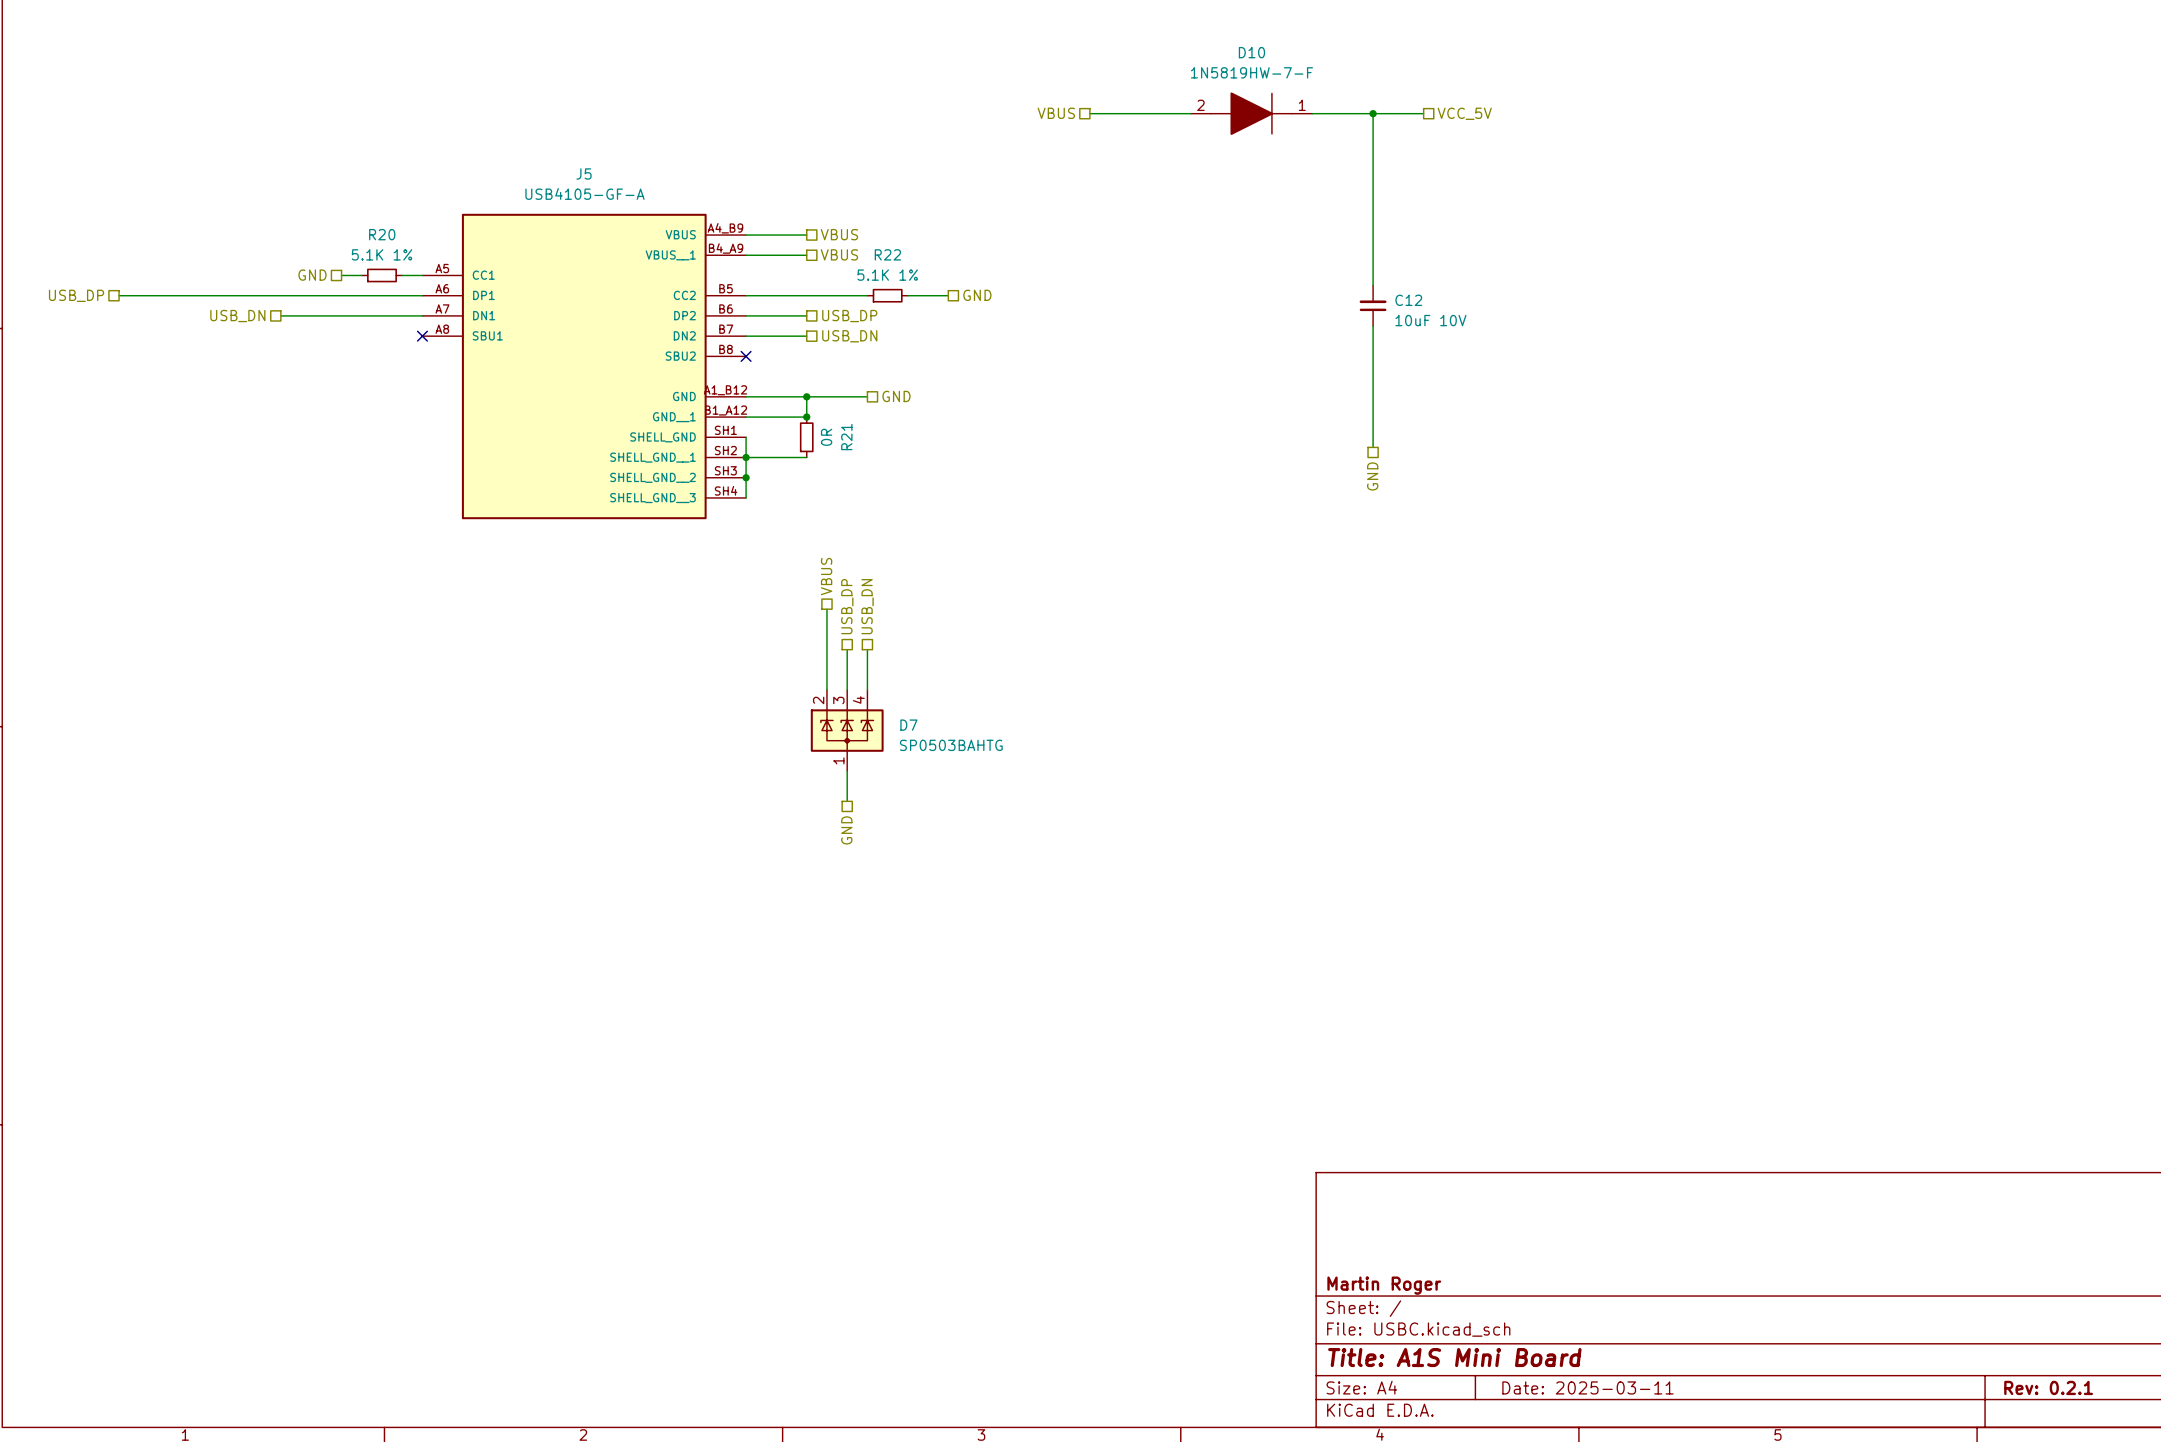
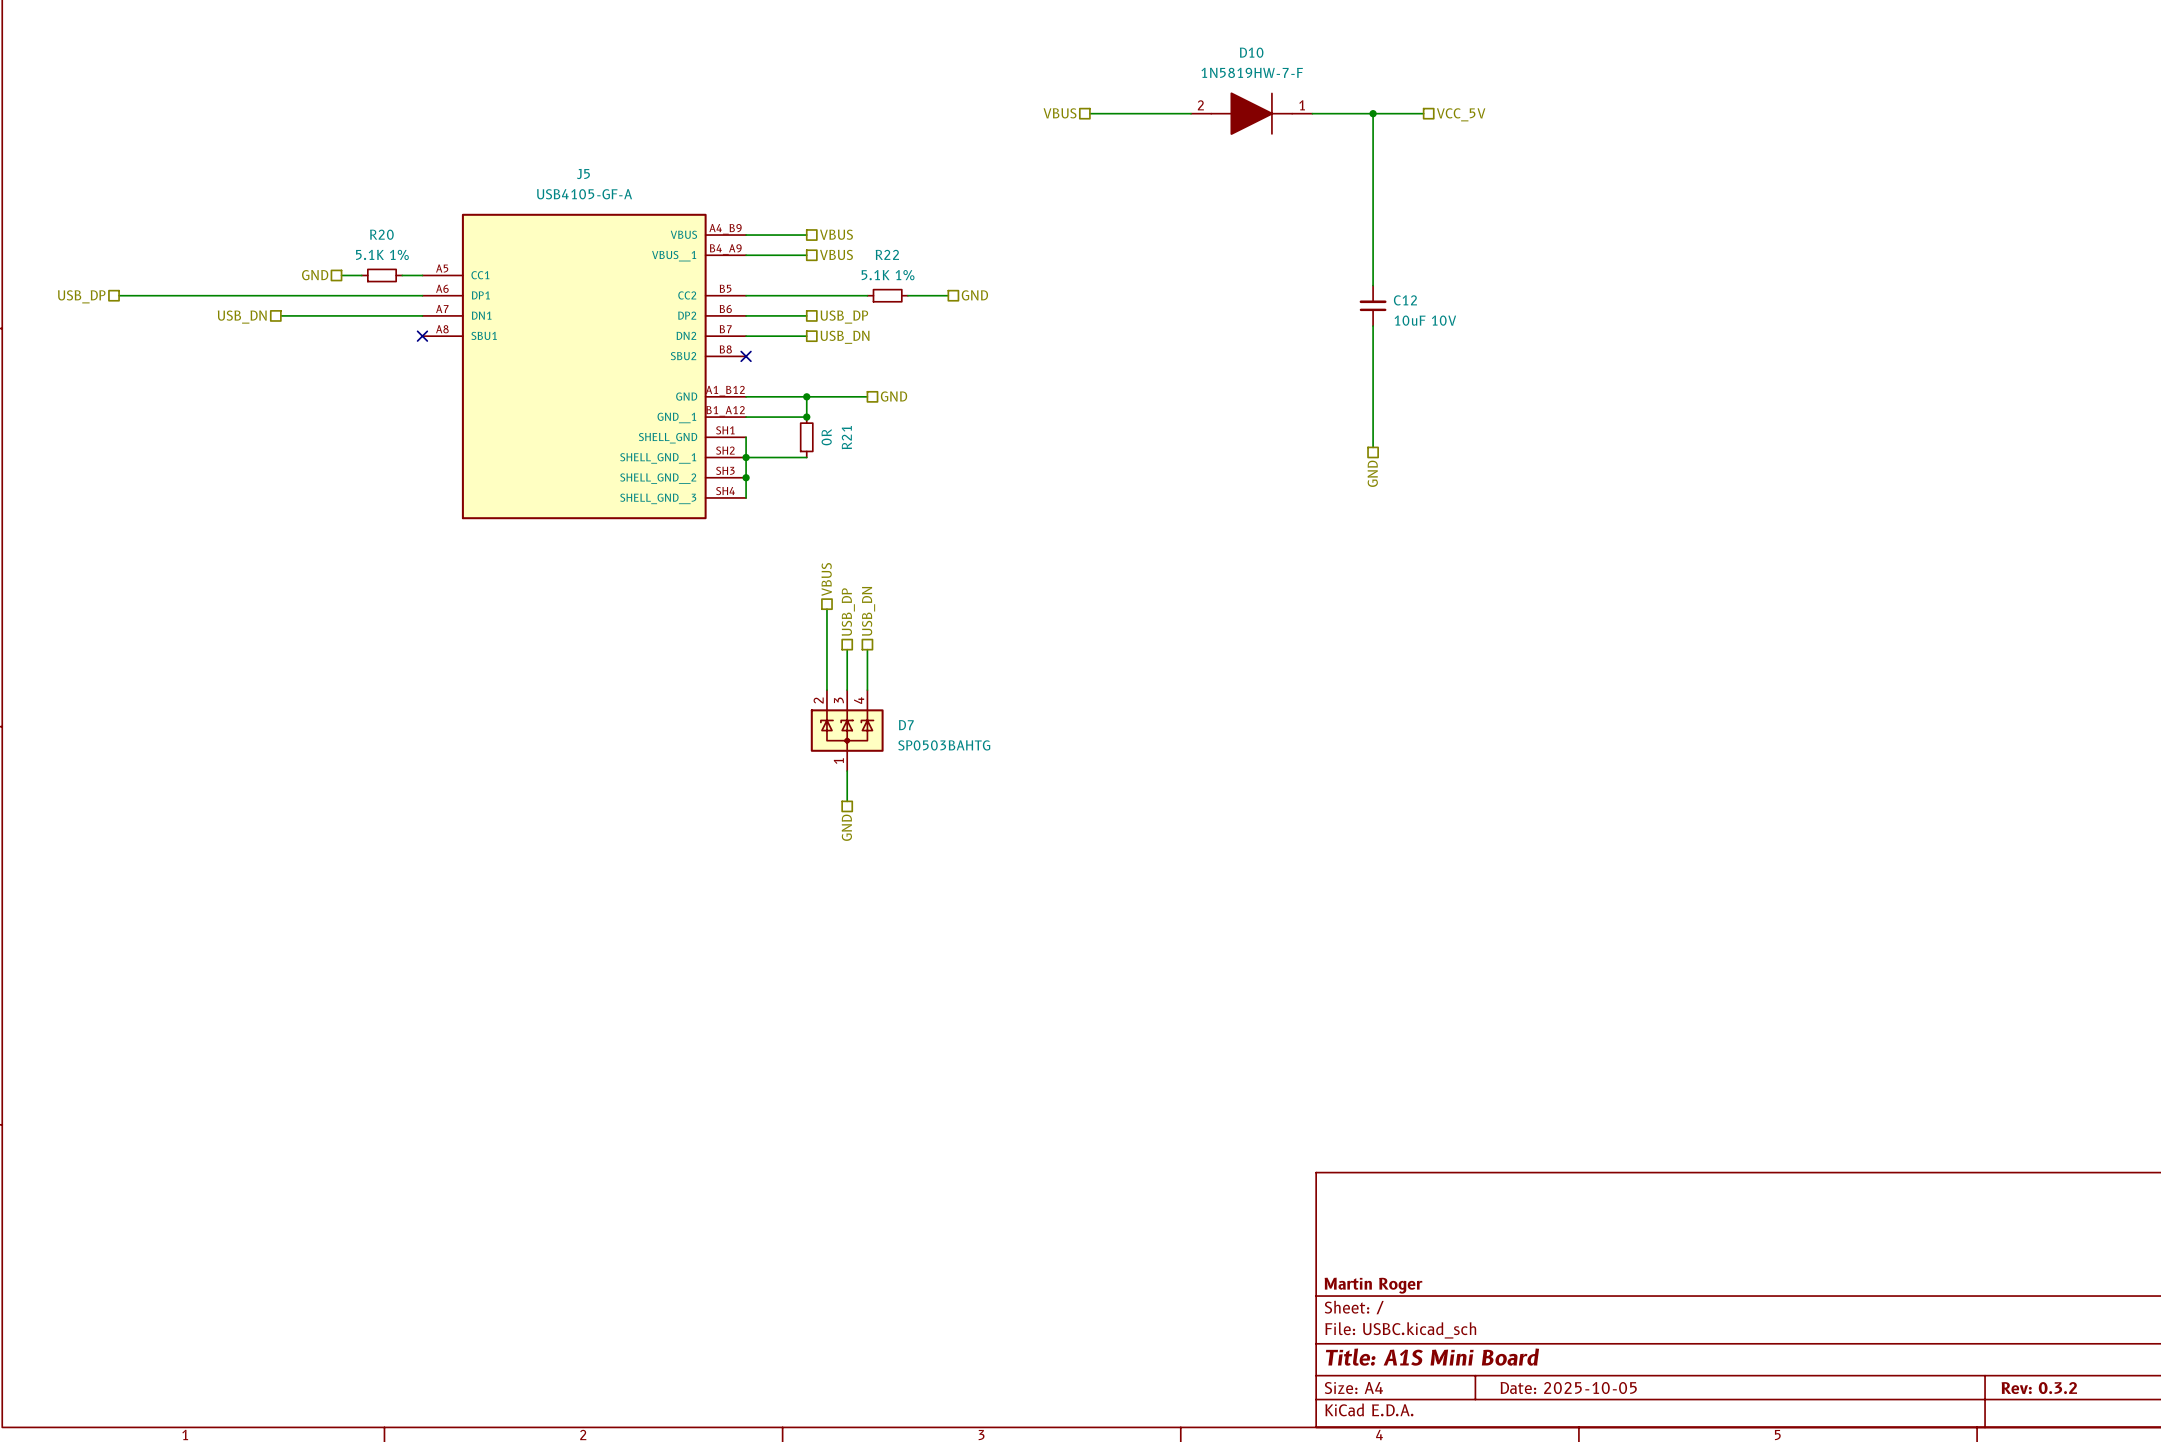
title block: Date: 2025-03-11 (1587, 1387) -> Date: 2025-10-05 (1568, 1388)
title block: Rev: 0.2.1 (2048, 1387) -> Rev: 0.3.2 (2039, 1388)

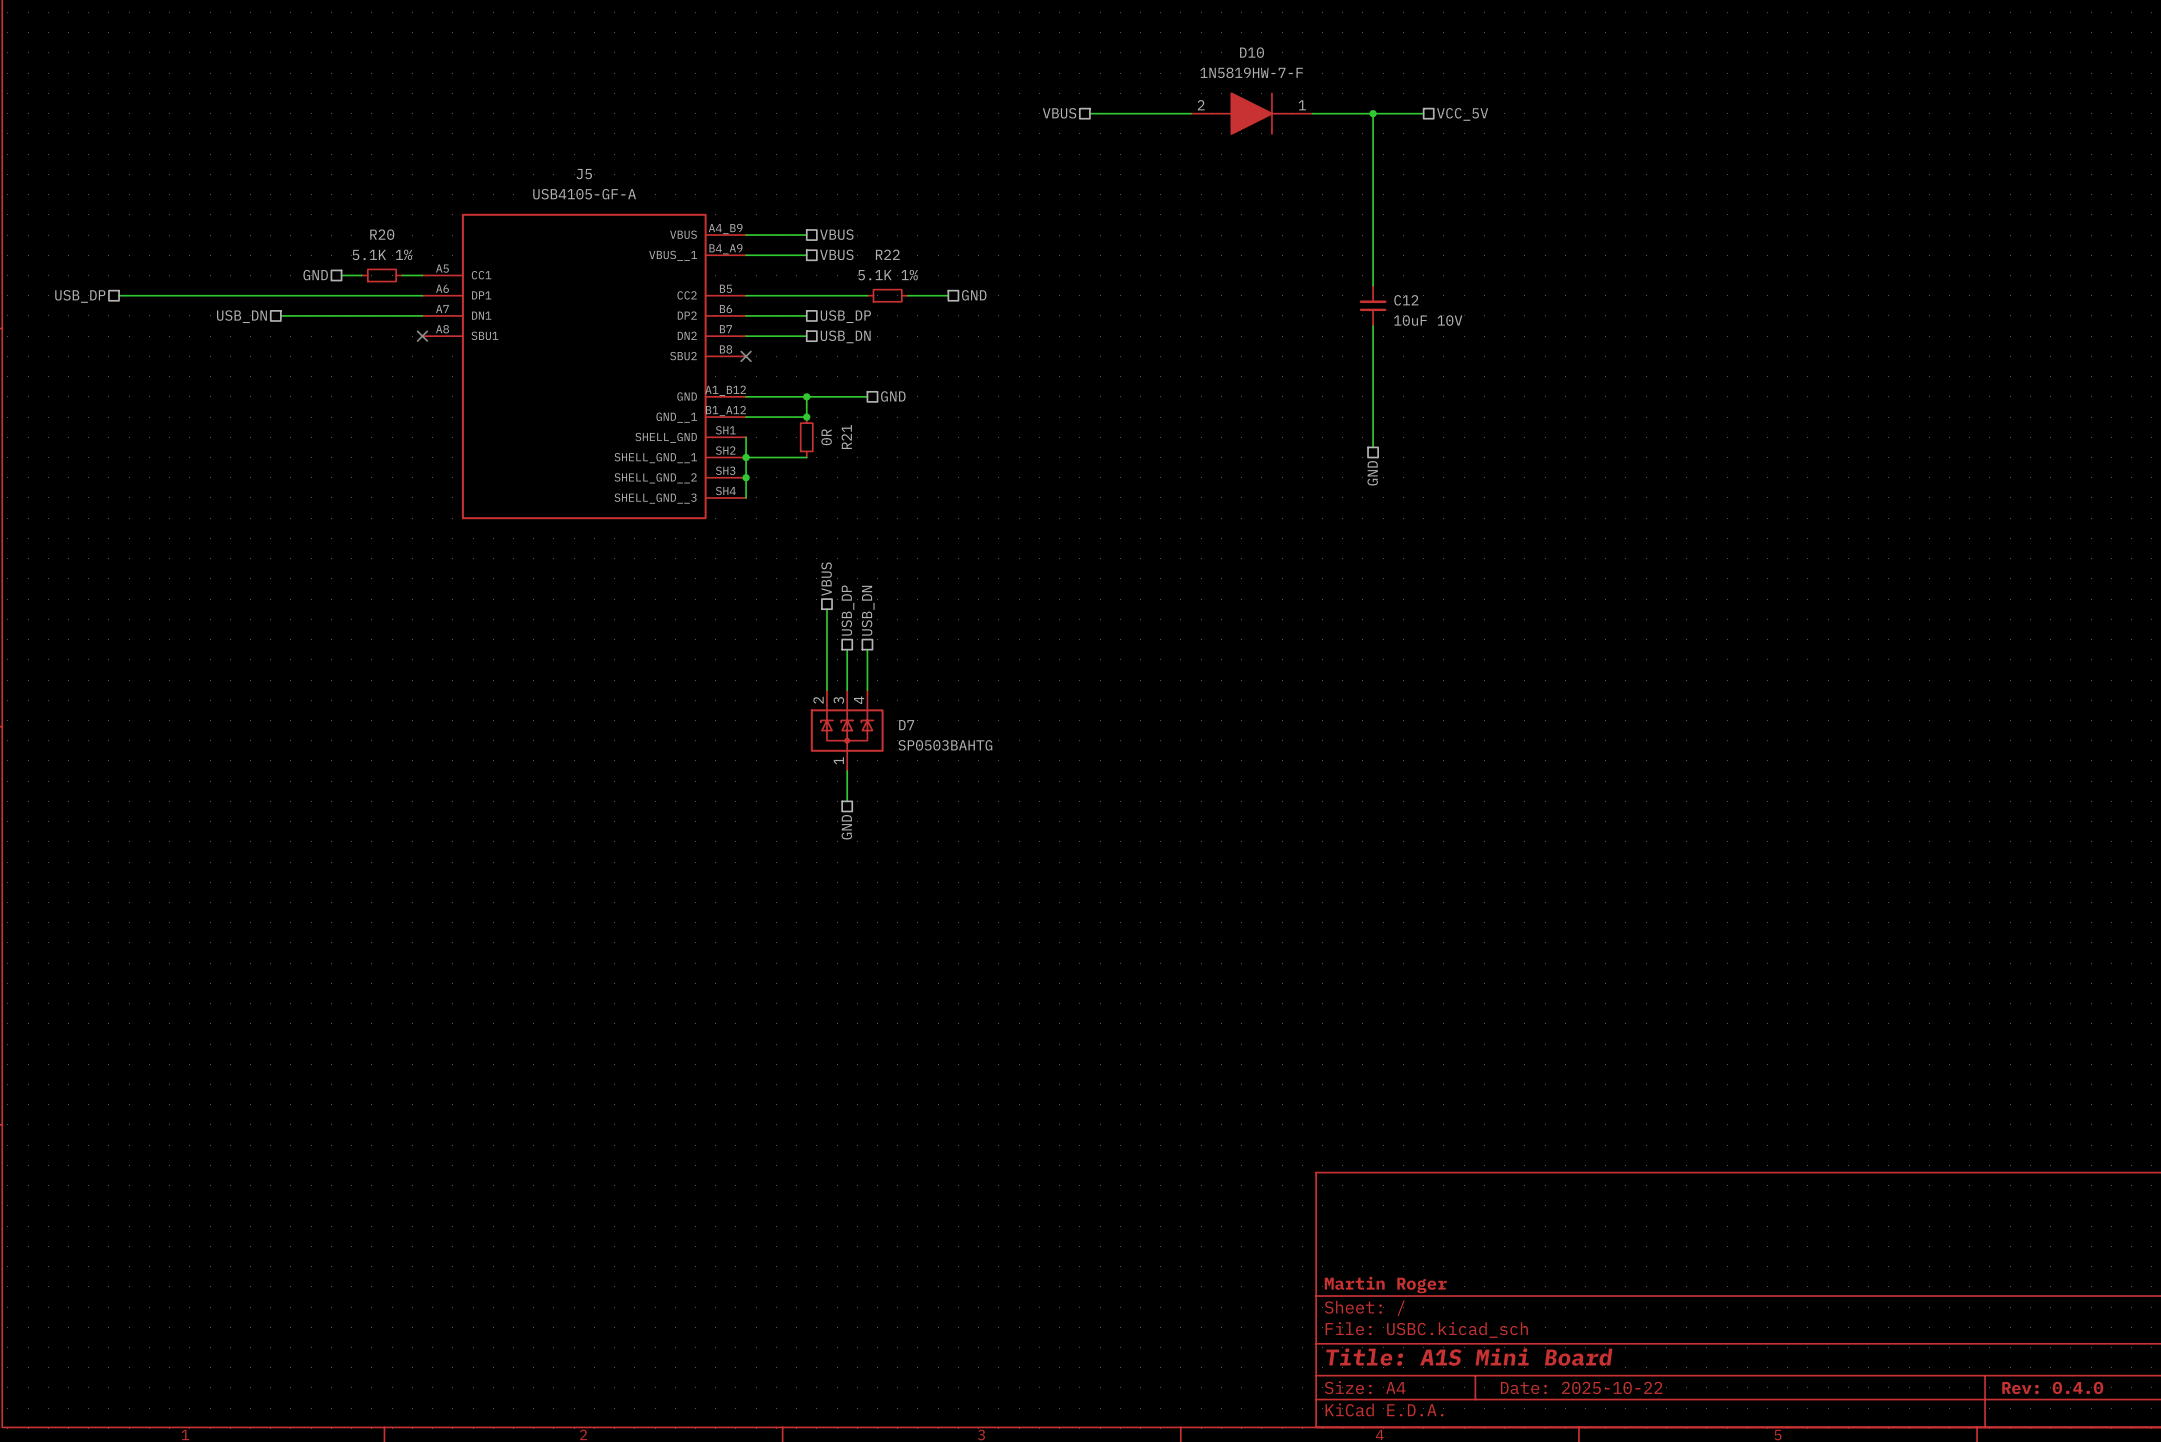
title block: Date: 2025-10-05 (1568, 1388) -> Date: 2025-10-22 (1581, 1387)
title block: Rev: 0.3.2 (2039, 1388) -> Rev: 0.4.0 (2052, 1387)

